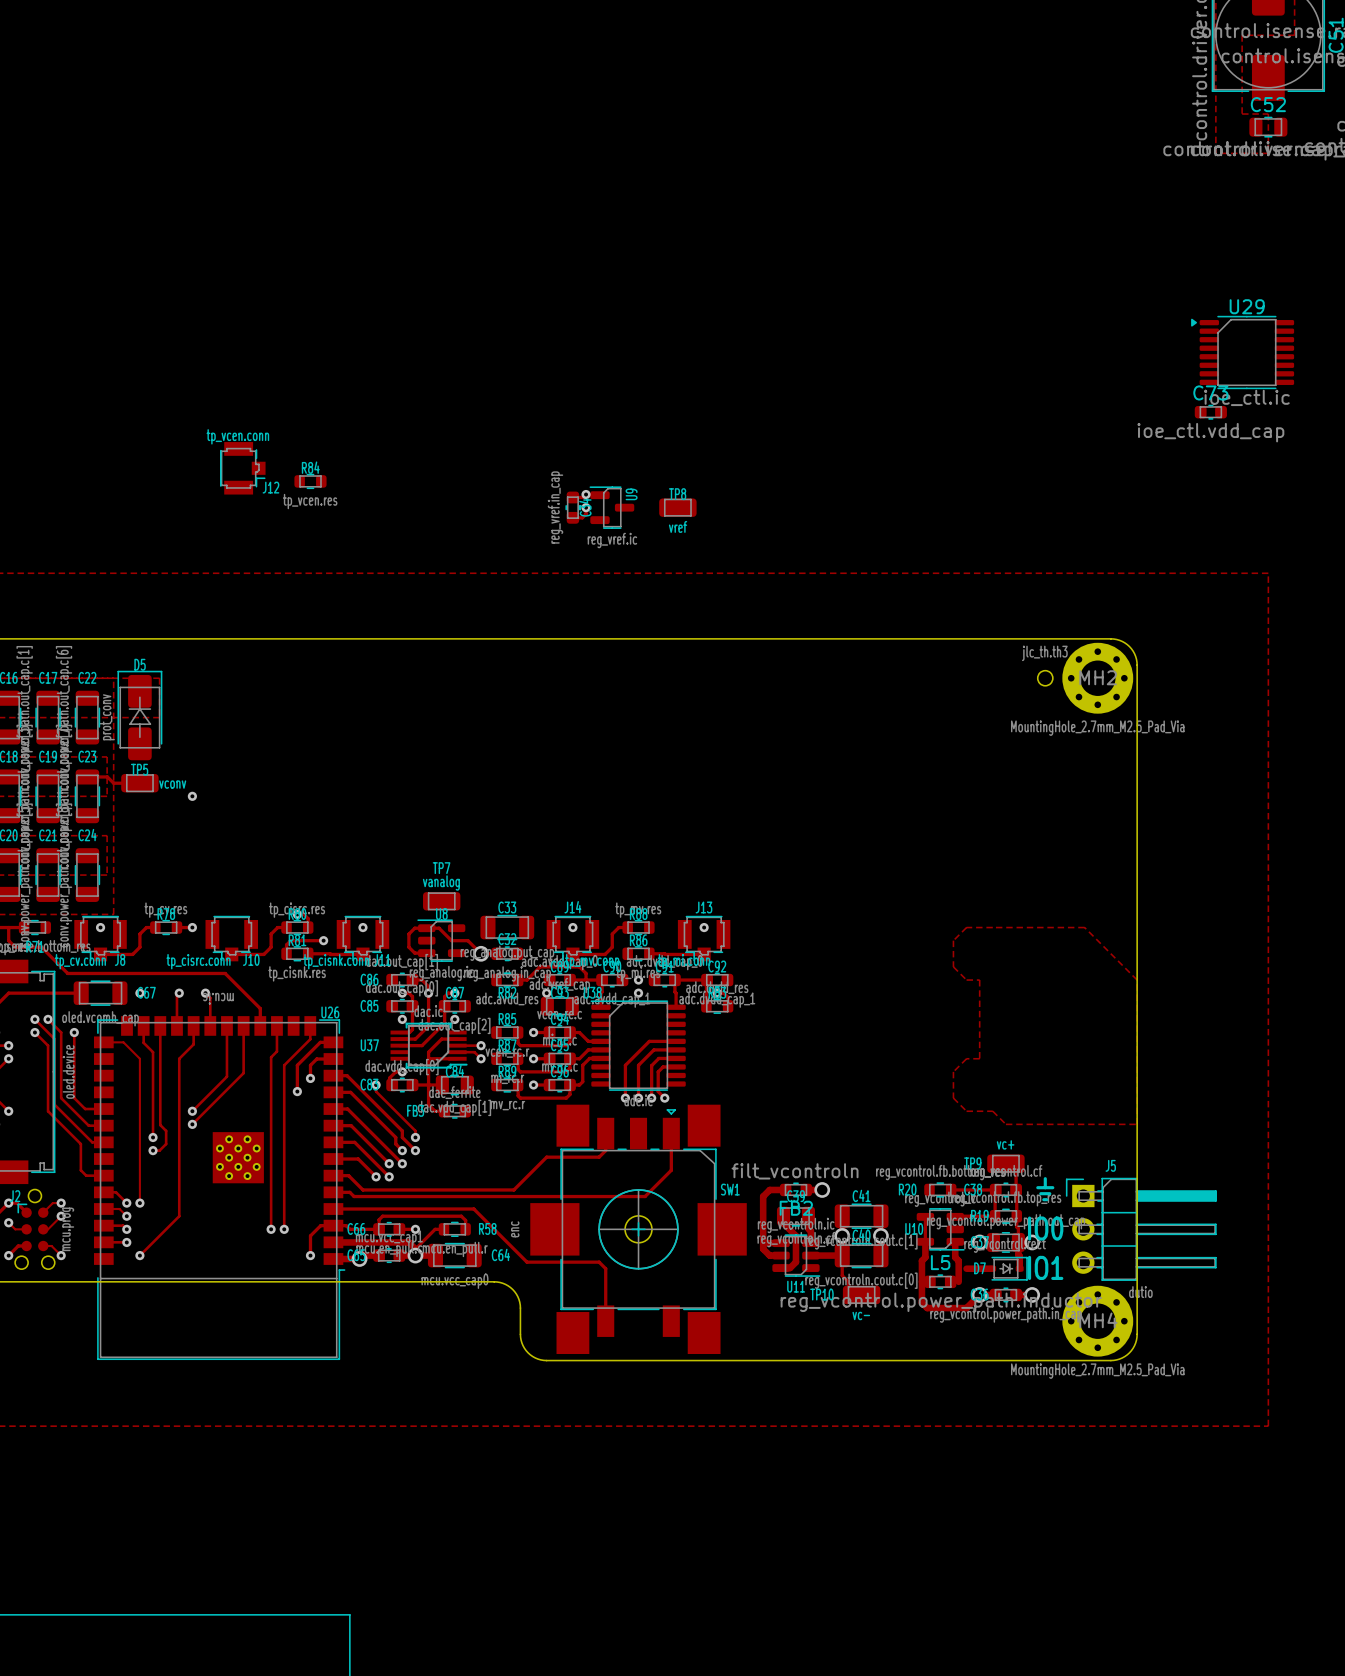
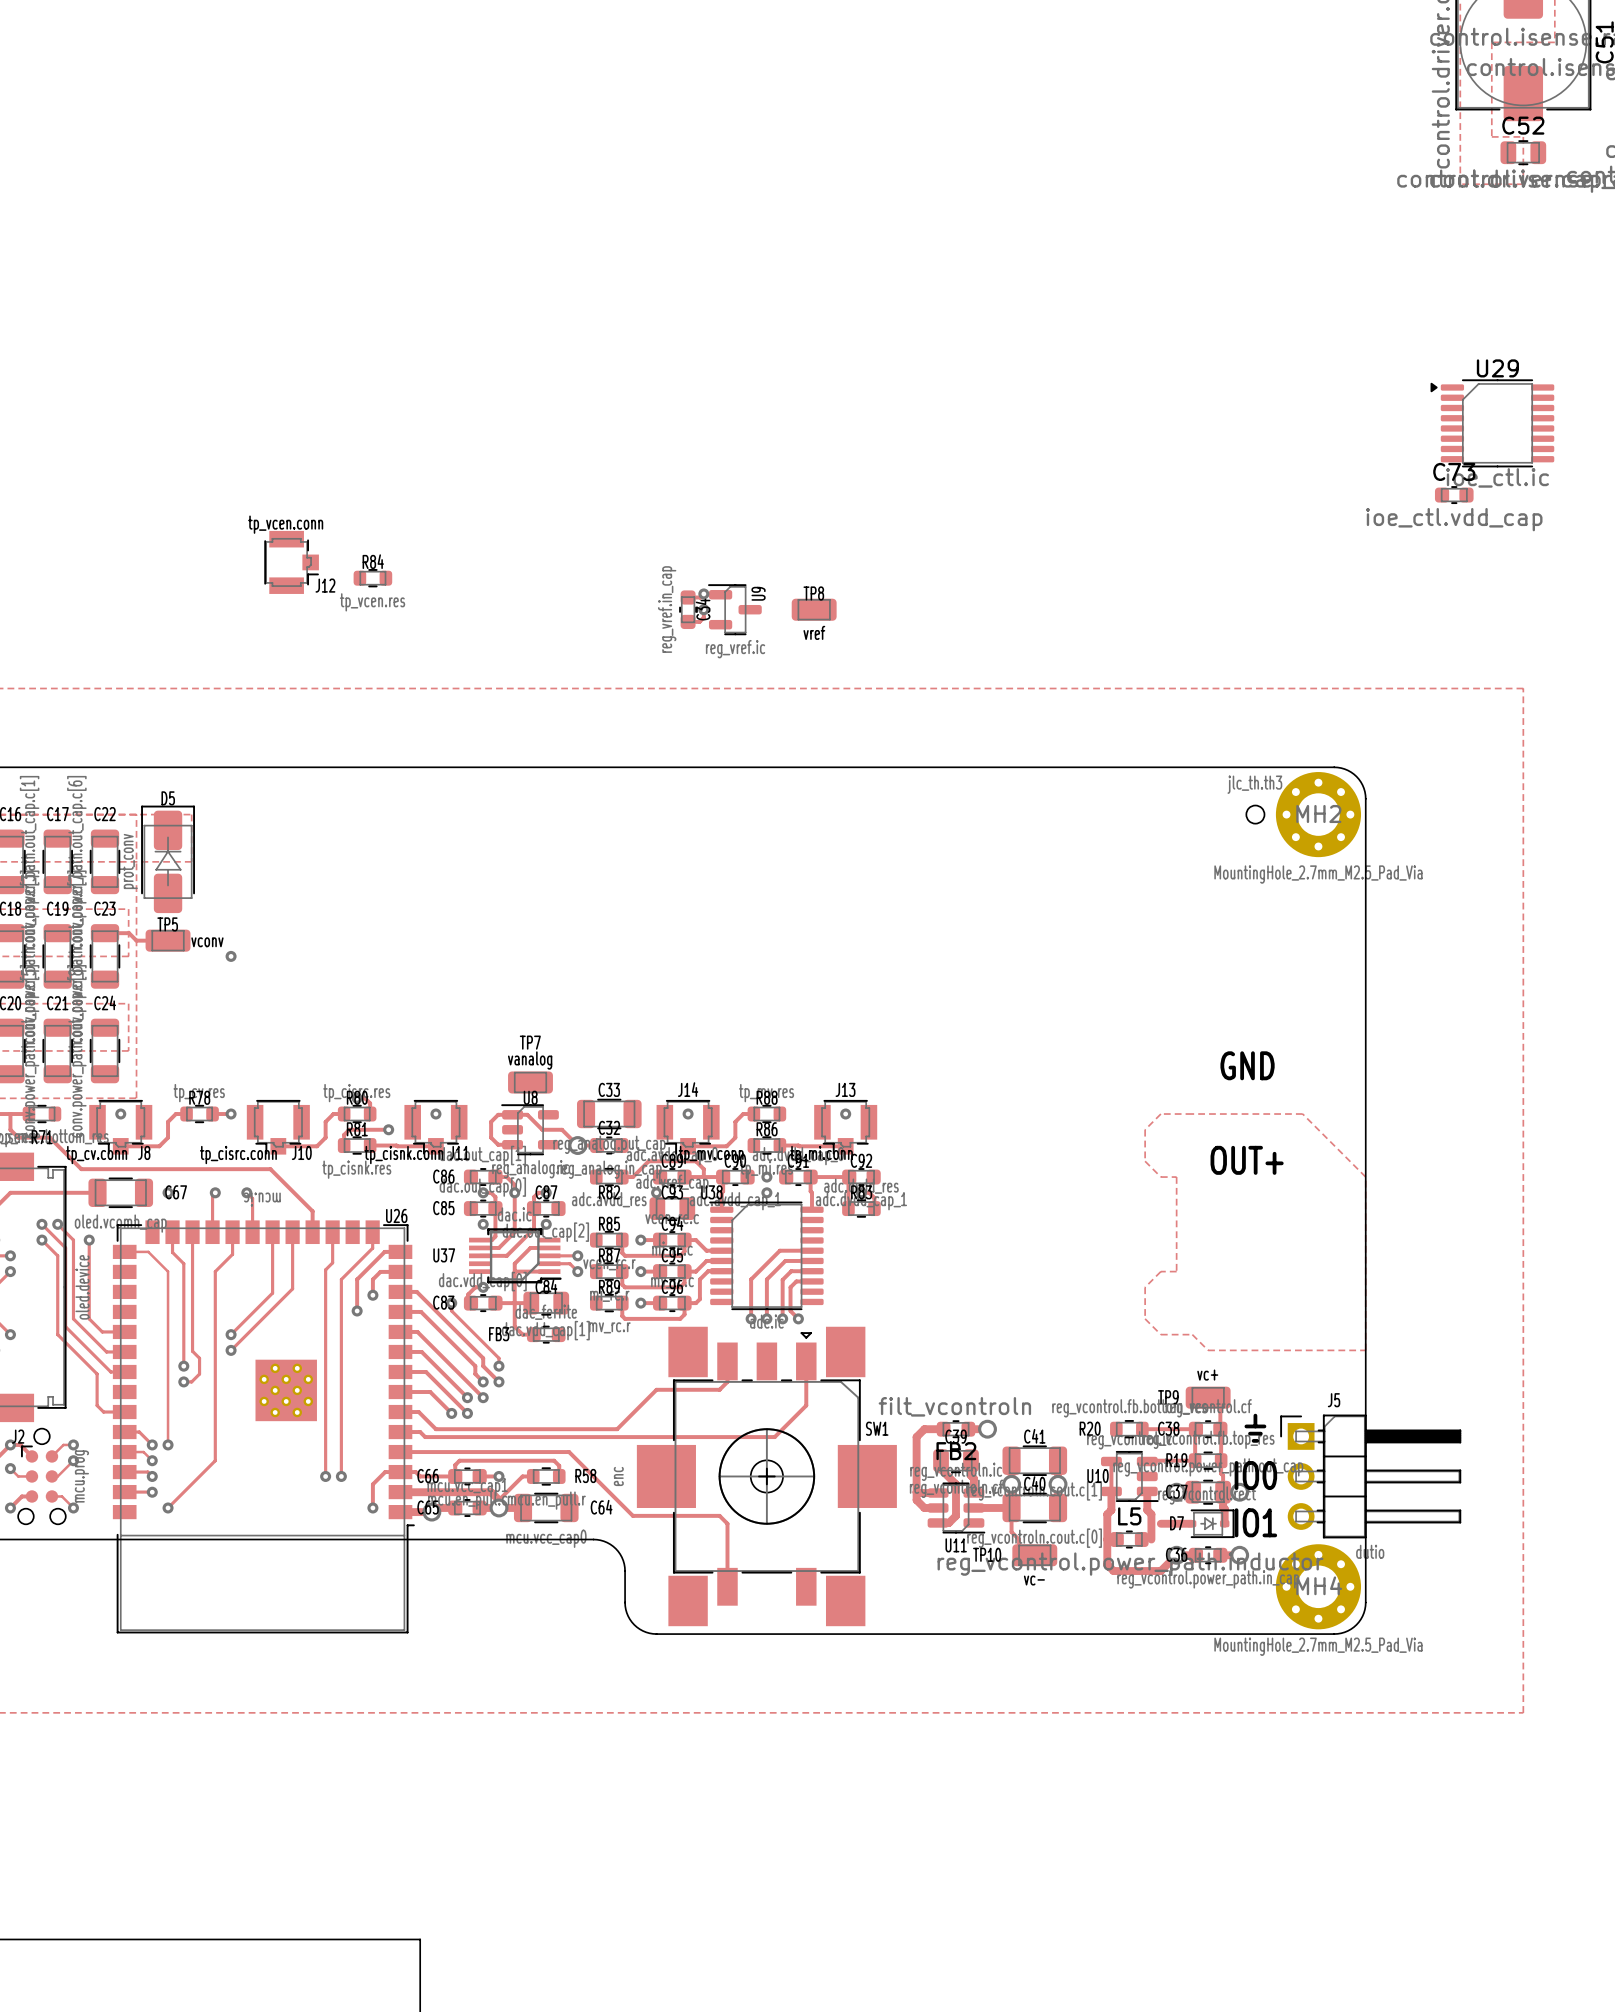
text: none -> GND (1247, 1065)
text: none -> OUT+ (1247, 1160)

